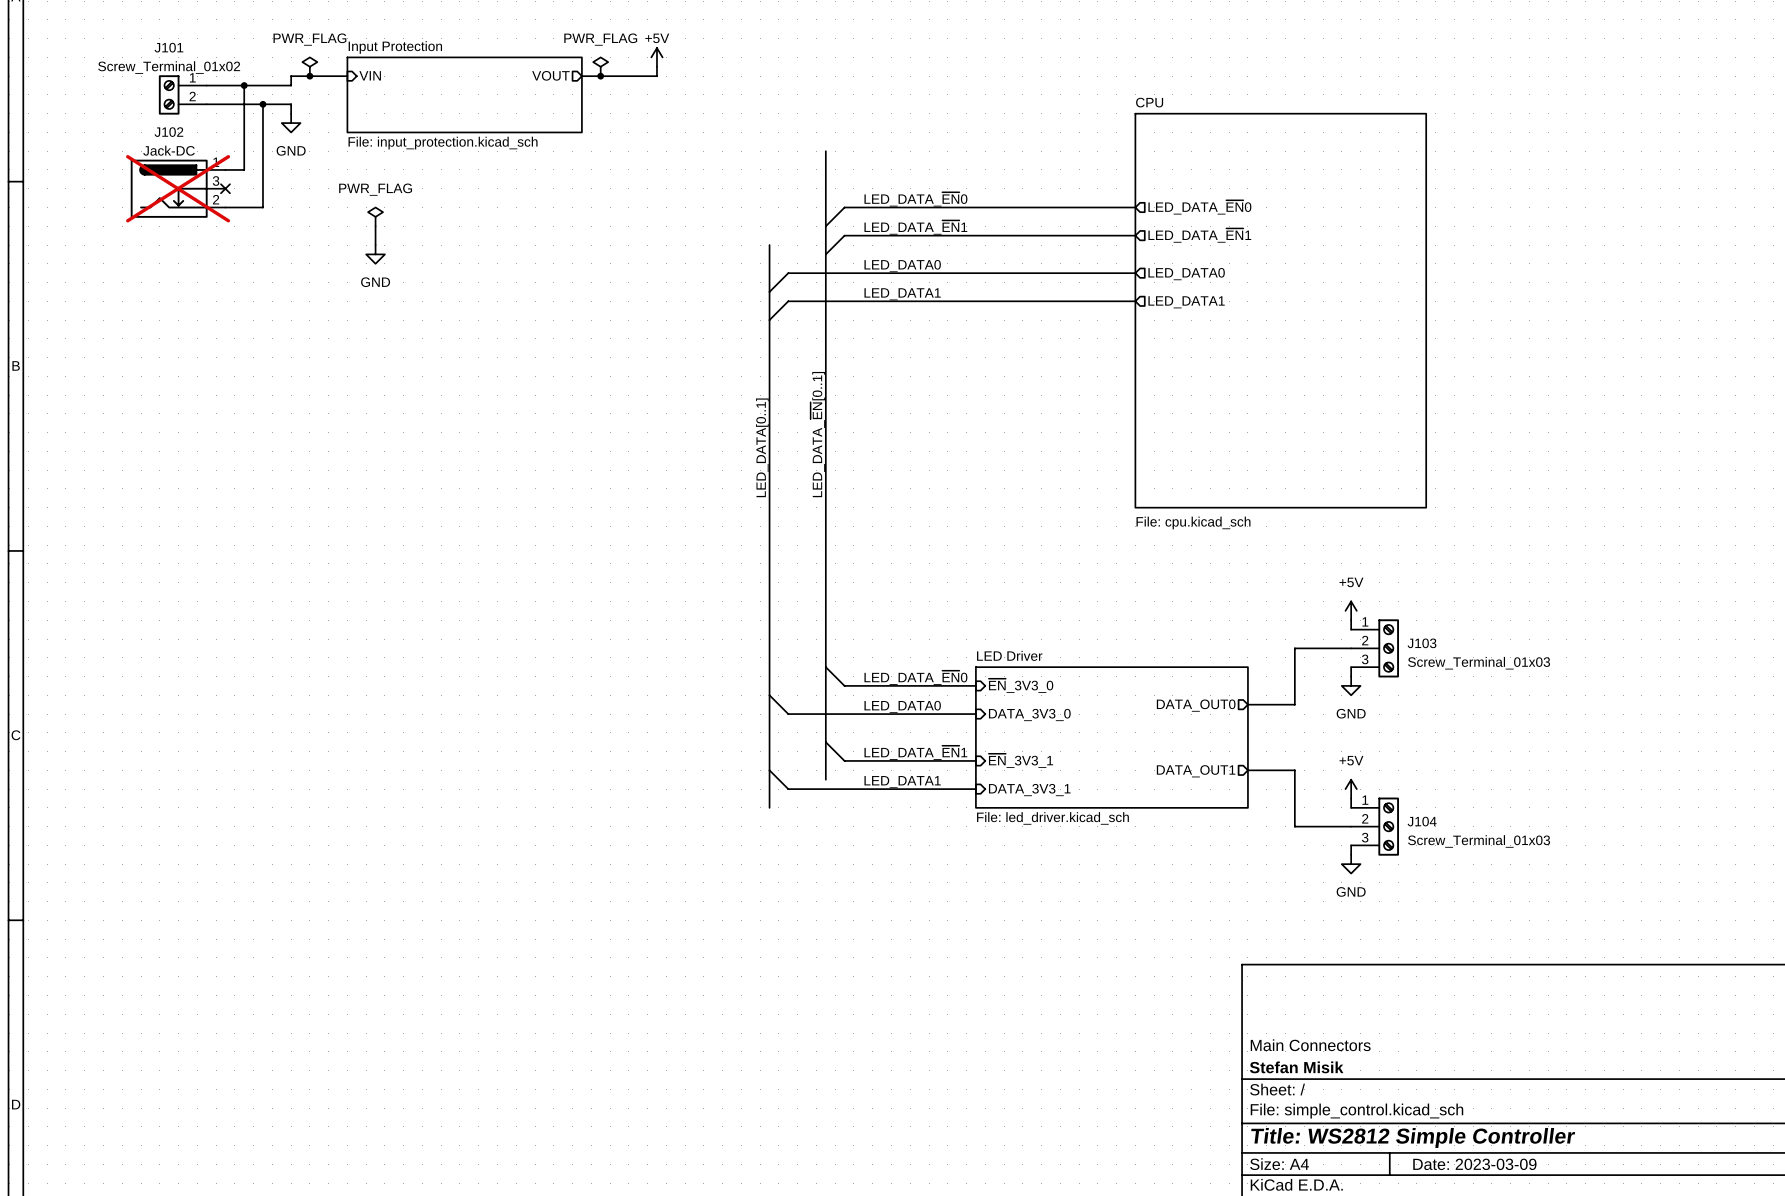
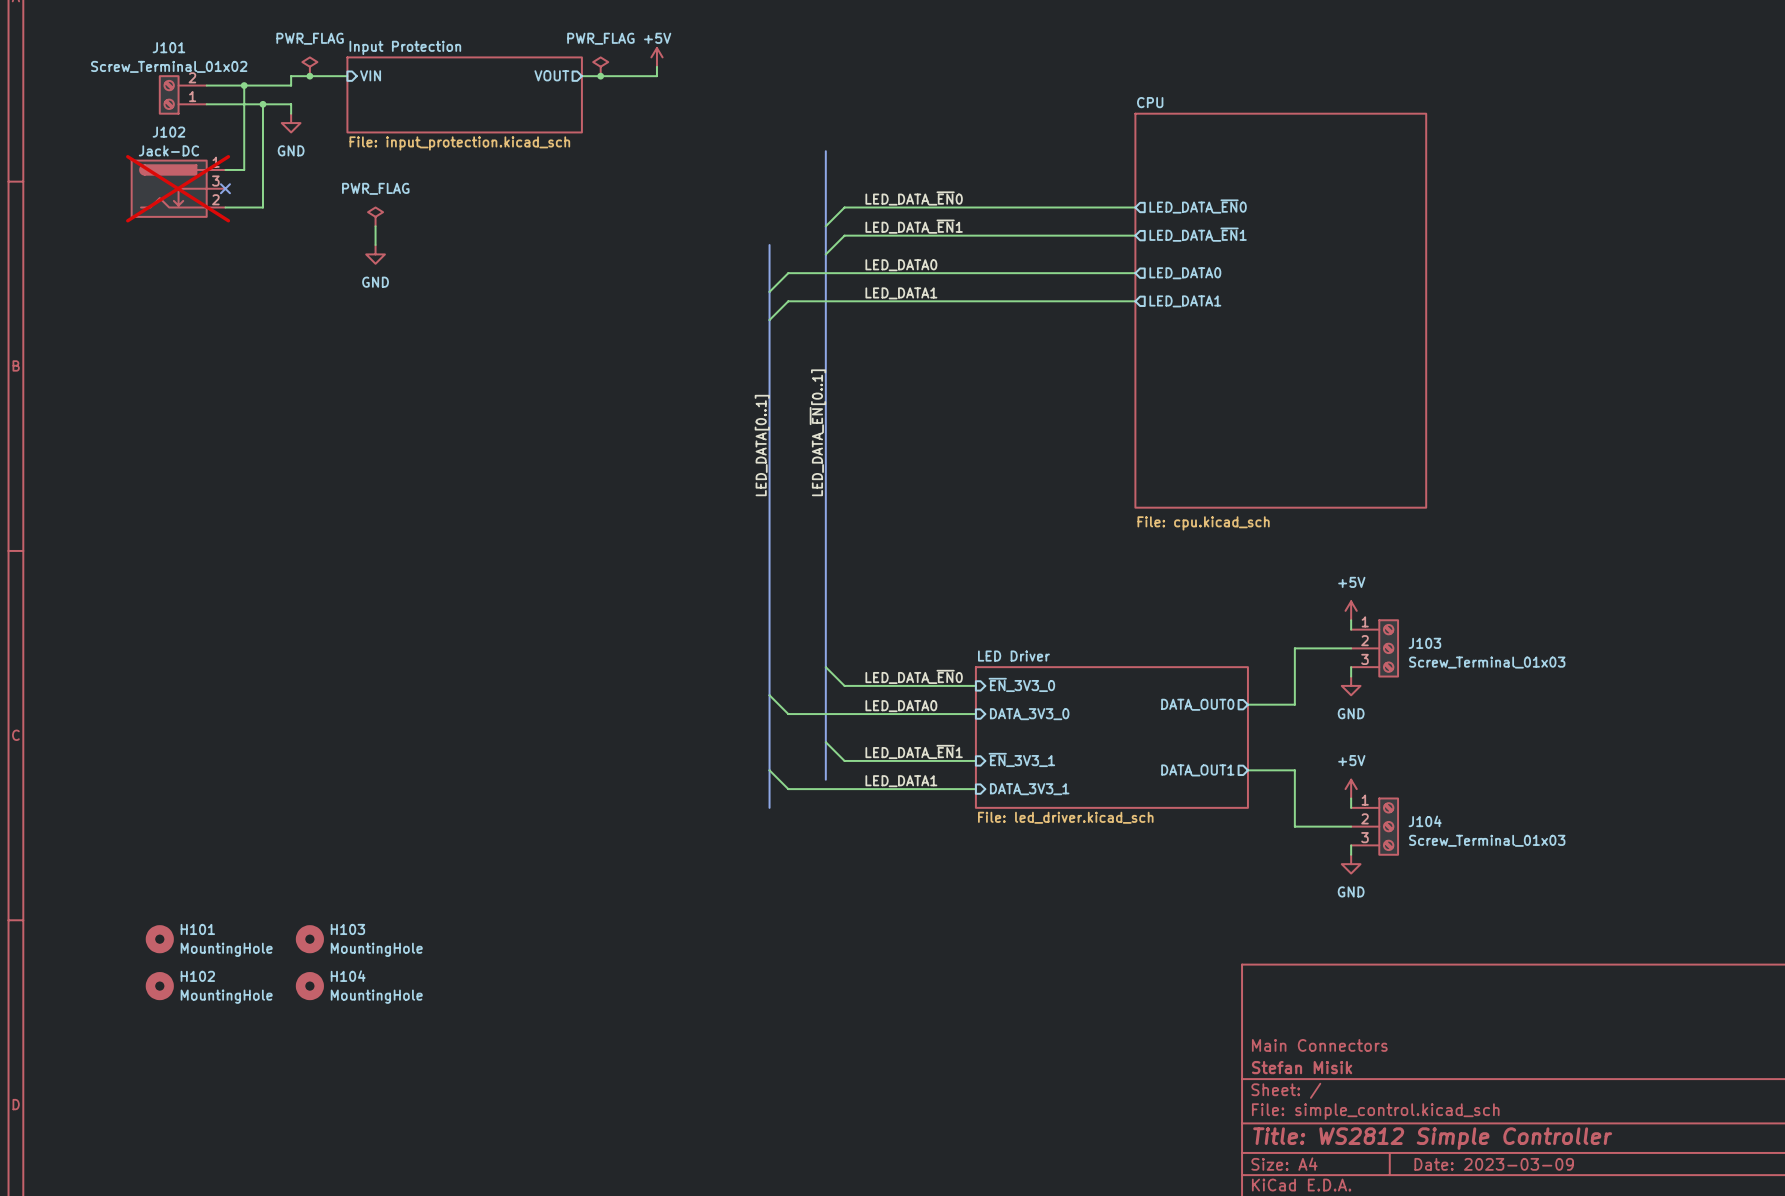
J101 flip: as is (169, 94) -> up-down (169, 94)
H101: none -> MountingHole (159, 939)
H103: none -> MountingHole (309, 939)
H102: none -> MountingHole (159, 986)
H104: none -> MountingHole (309, 986)

